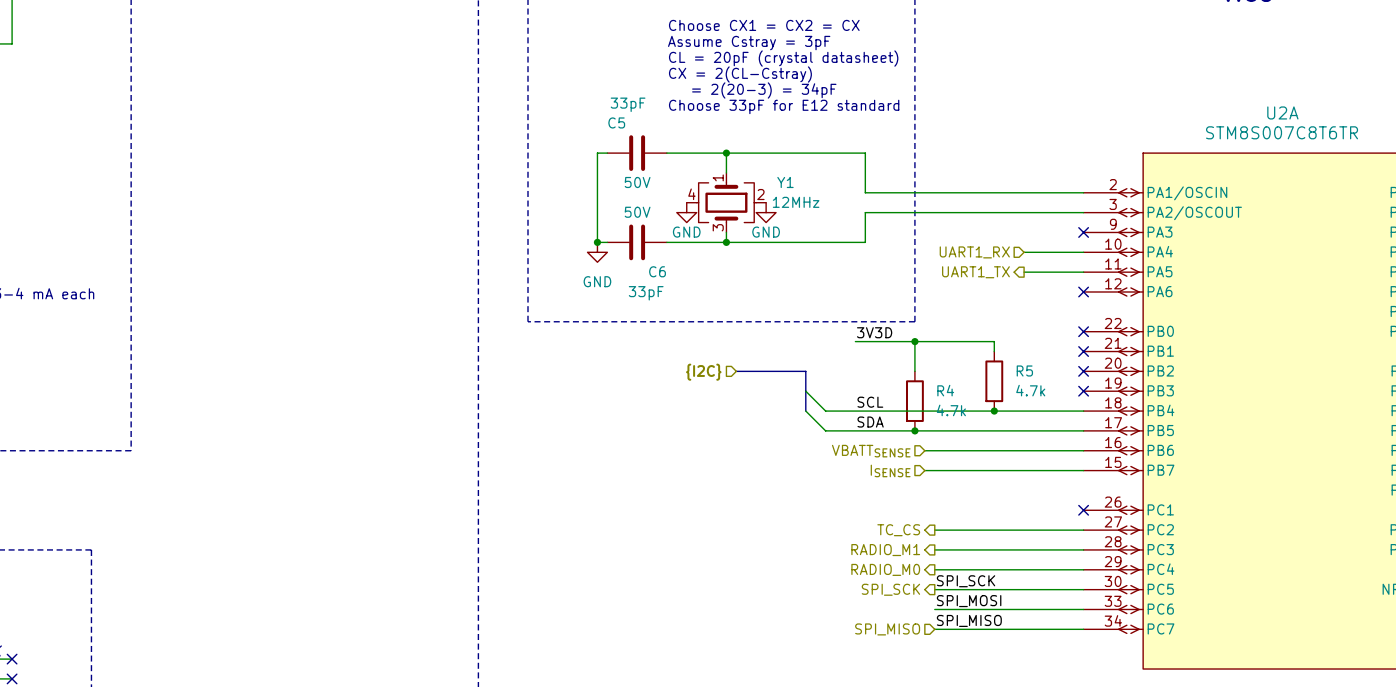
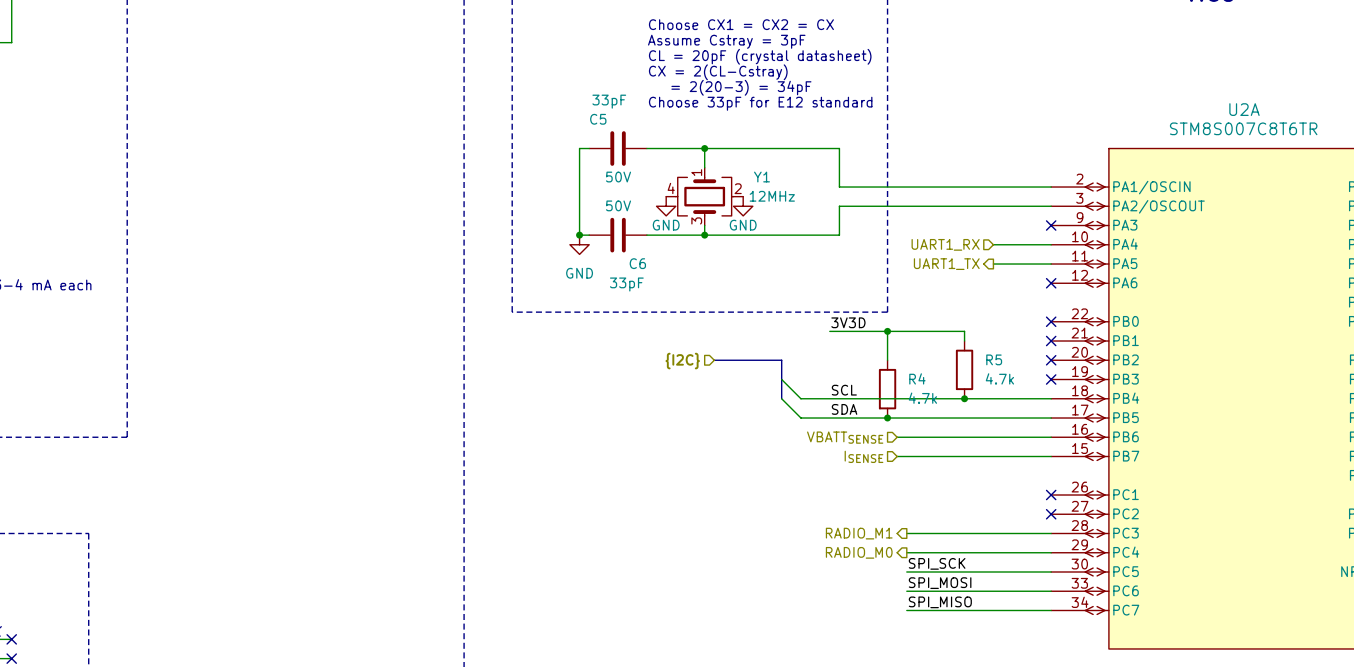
hierarchical label: TC_CS (898, 530) -> none
wire: (934, 530) (1083, 530) -> none
no-connect mark: none -> (1051, 514)
hierarchical label: SPI_SCK (890, 589) -> none
hierarchical label: SPI_MISO (887, 629) -> none

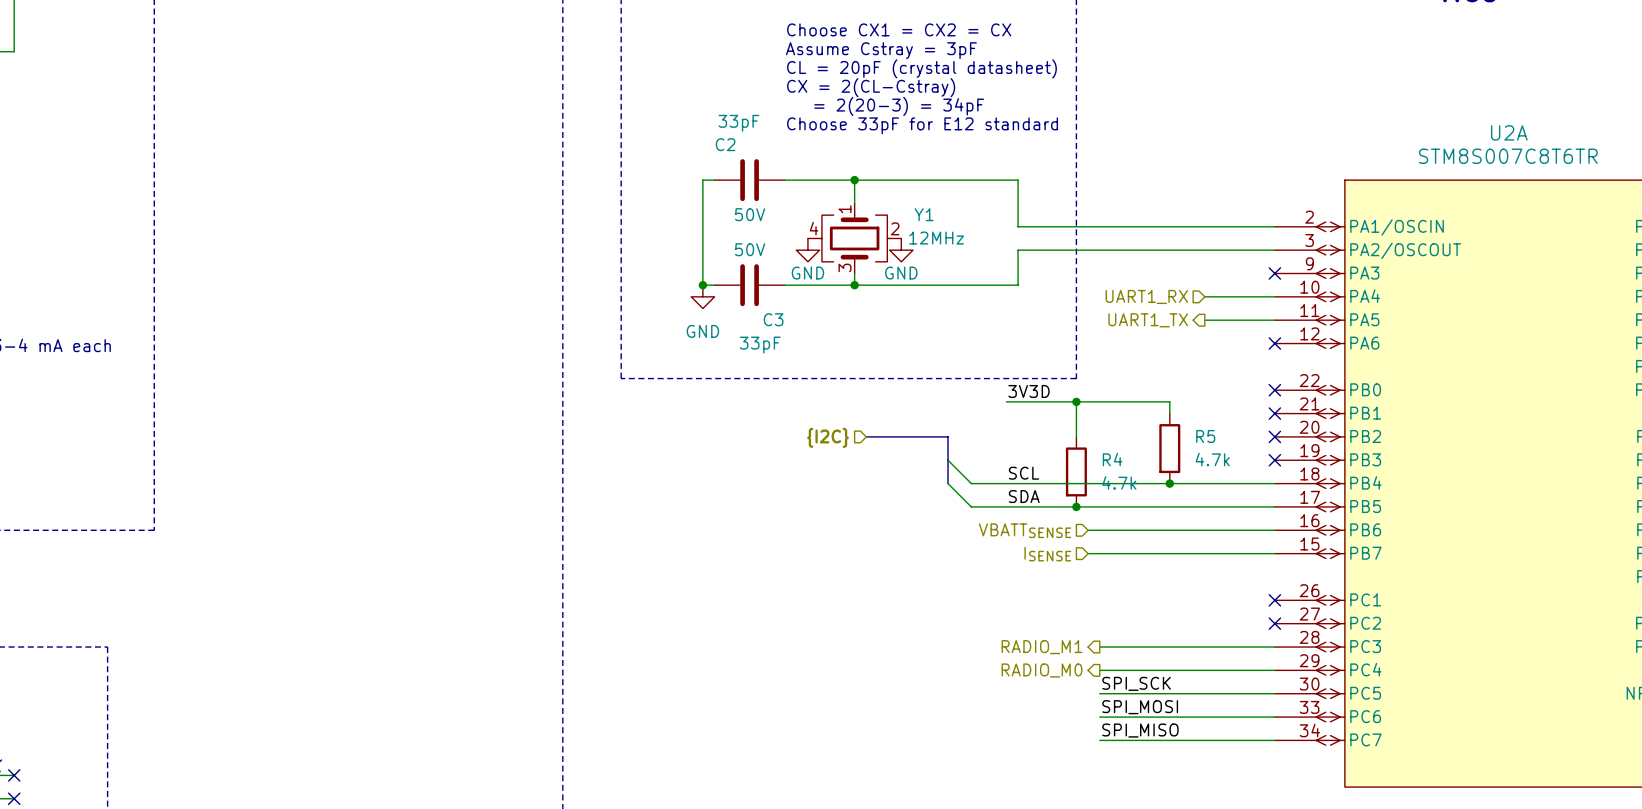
C5 name: C5 (598, 119) -> C2 (725, 144)
C6 name: C6 (637, 263) -> C3 (773, 319)

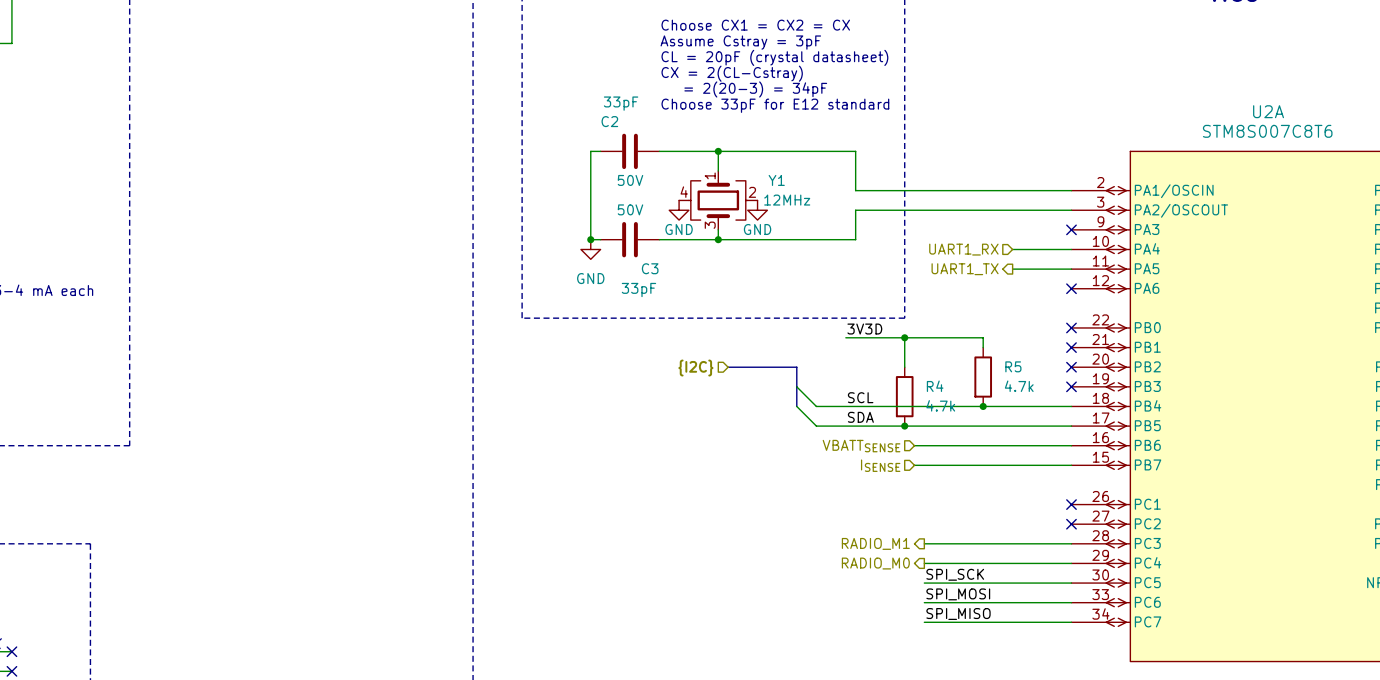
U2A value: STM8S007C8T6TR (1508, 156) -> STM8S007C8T6 (1267, 131)

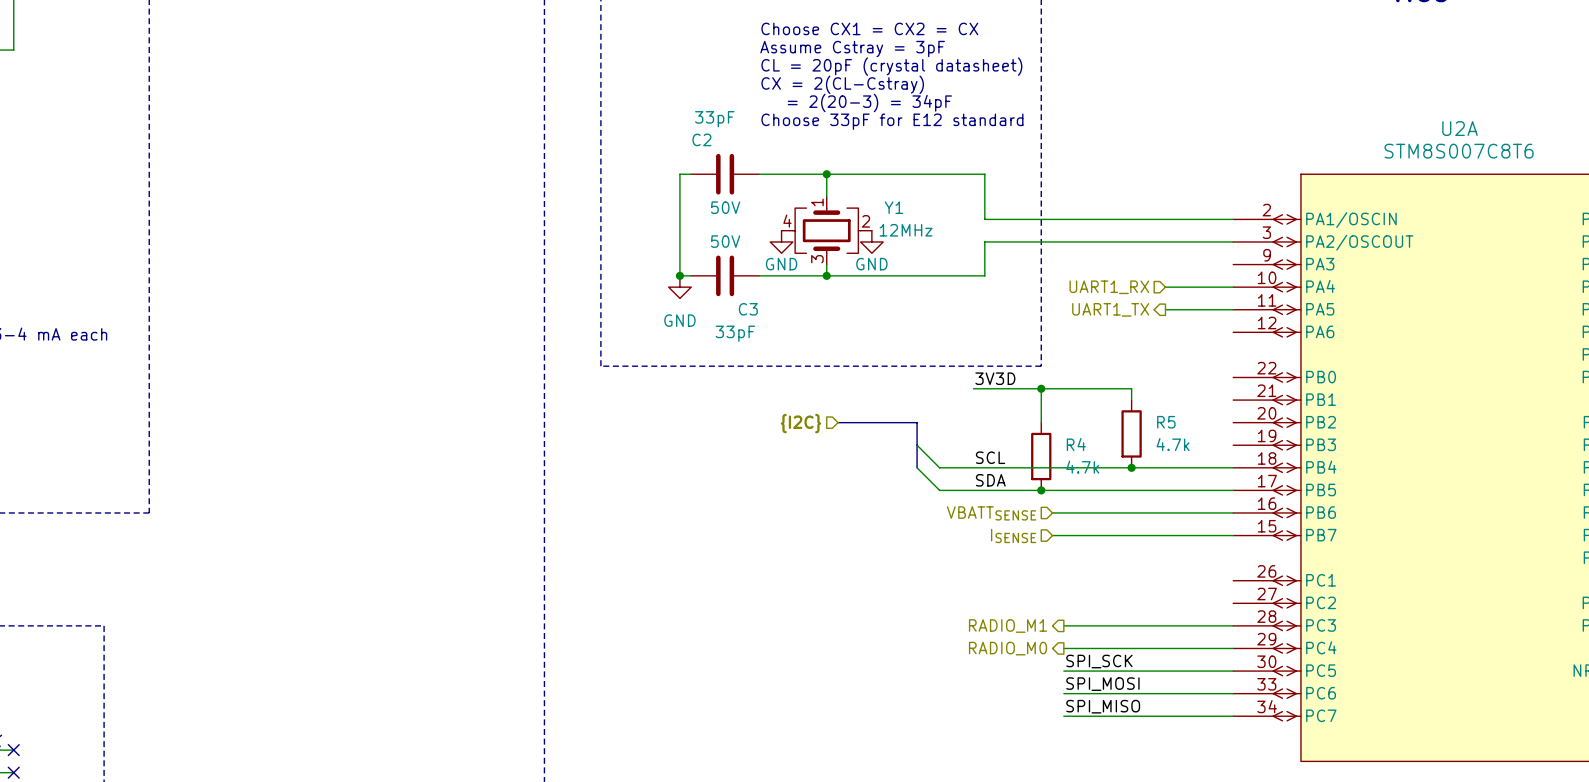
no-connect mark: (1071, 229) -> none
no-connect mark: (1071, 288) -> none
no-connect mark: (1071, 327) -> none
no-connect mark: (1071, 347) -> none
no-connect mark: (1071, 367) -> none
no-connect mark: (1071, 386) -> none
no-connect mark: (1071, 504) -> none
no-connect mark: (1071, 524) -> none

